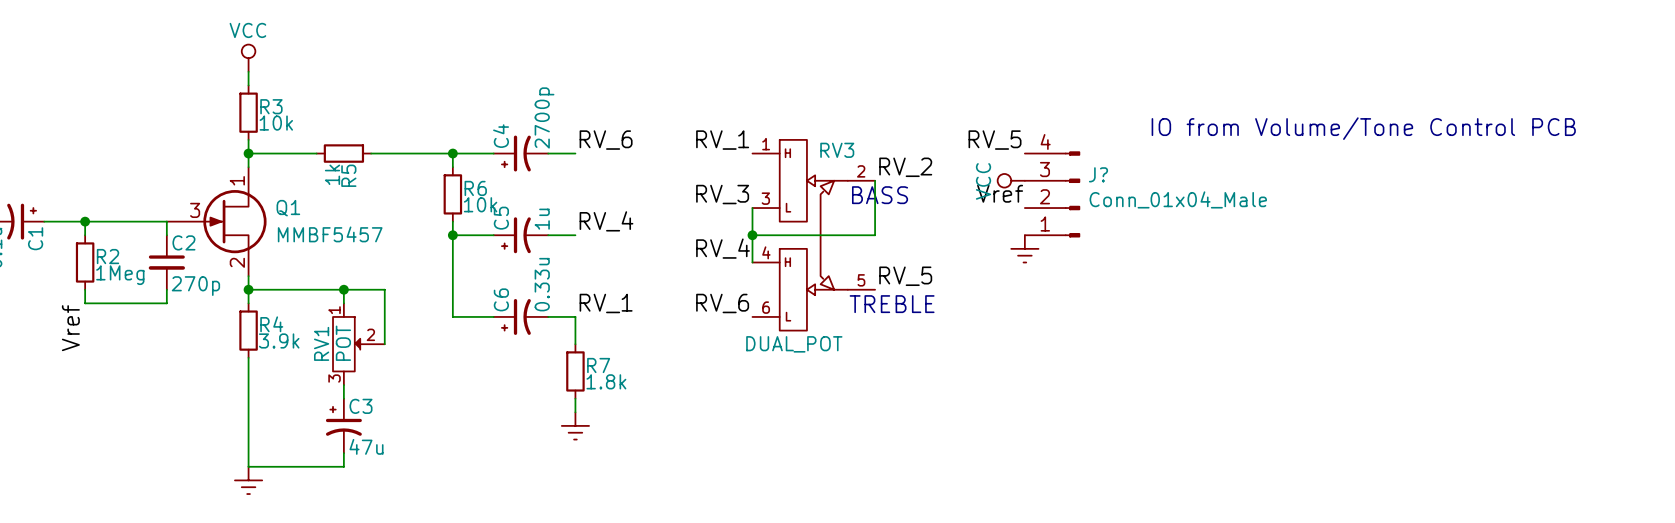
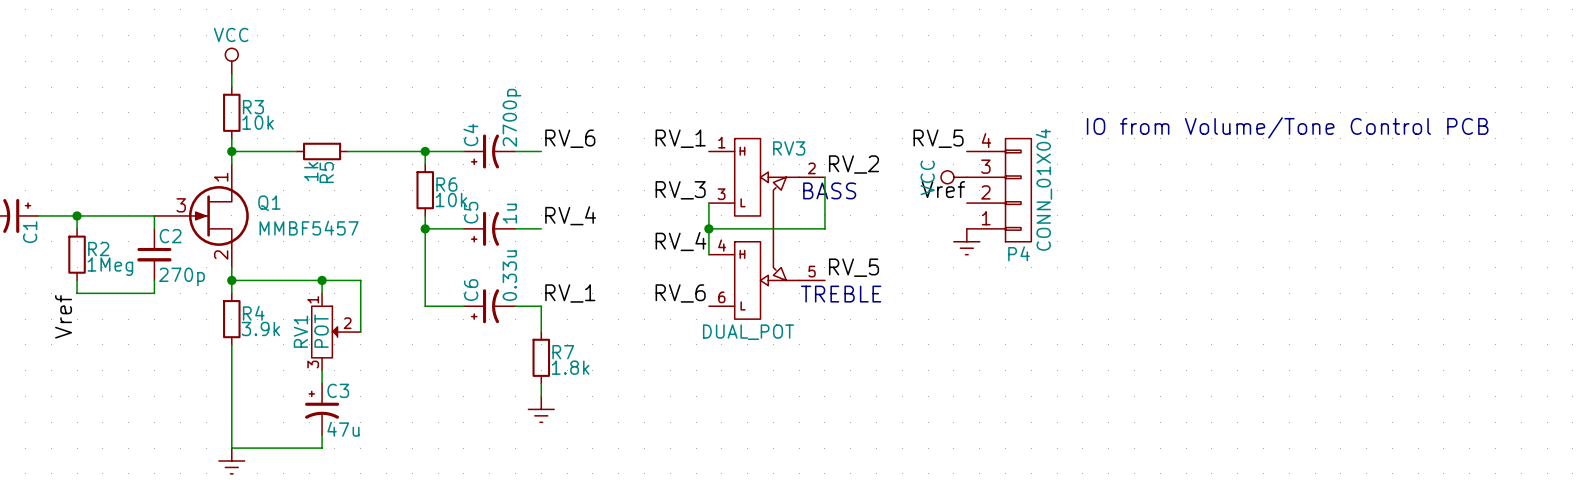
J?: Conn_01x04_Male (1052, 194) -> none
P4: none -> CONN_01X04 (999, 190)

